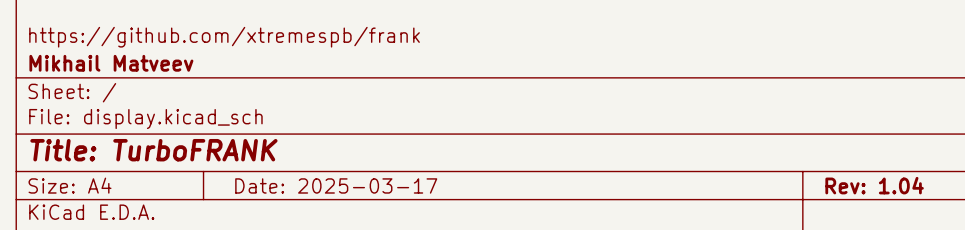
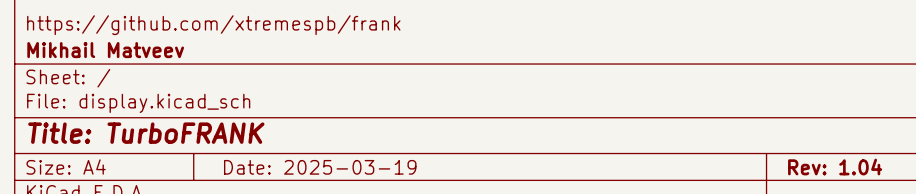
title block: Date: 2025-03-17 (336, 185) -> Date: 2025-03-19 (320, 167)

